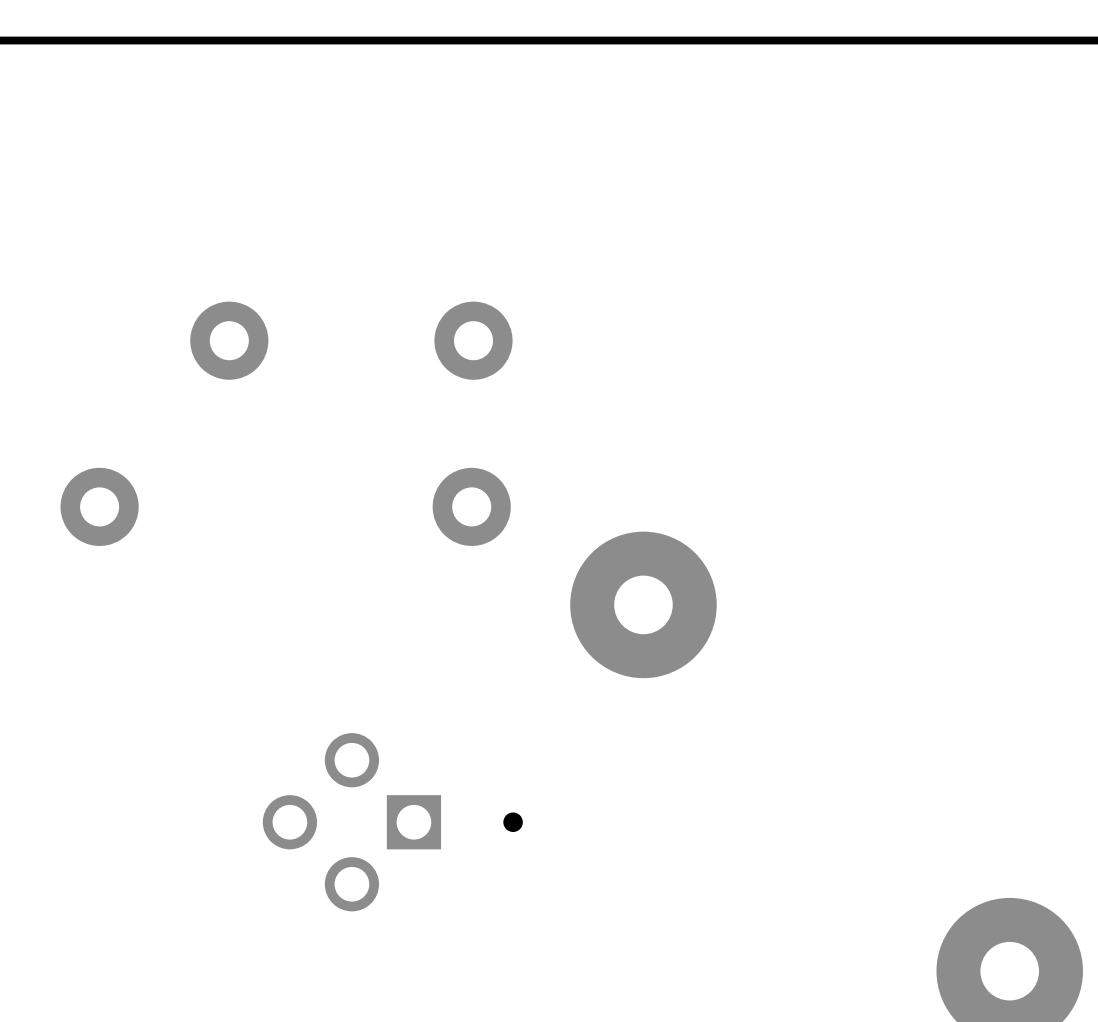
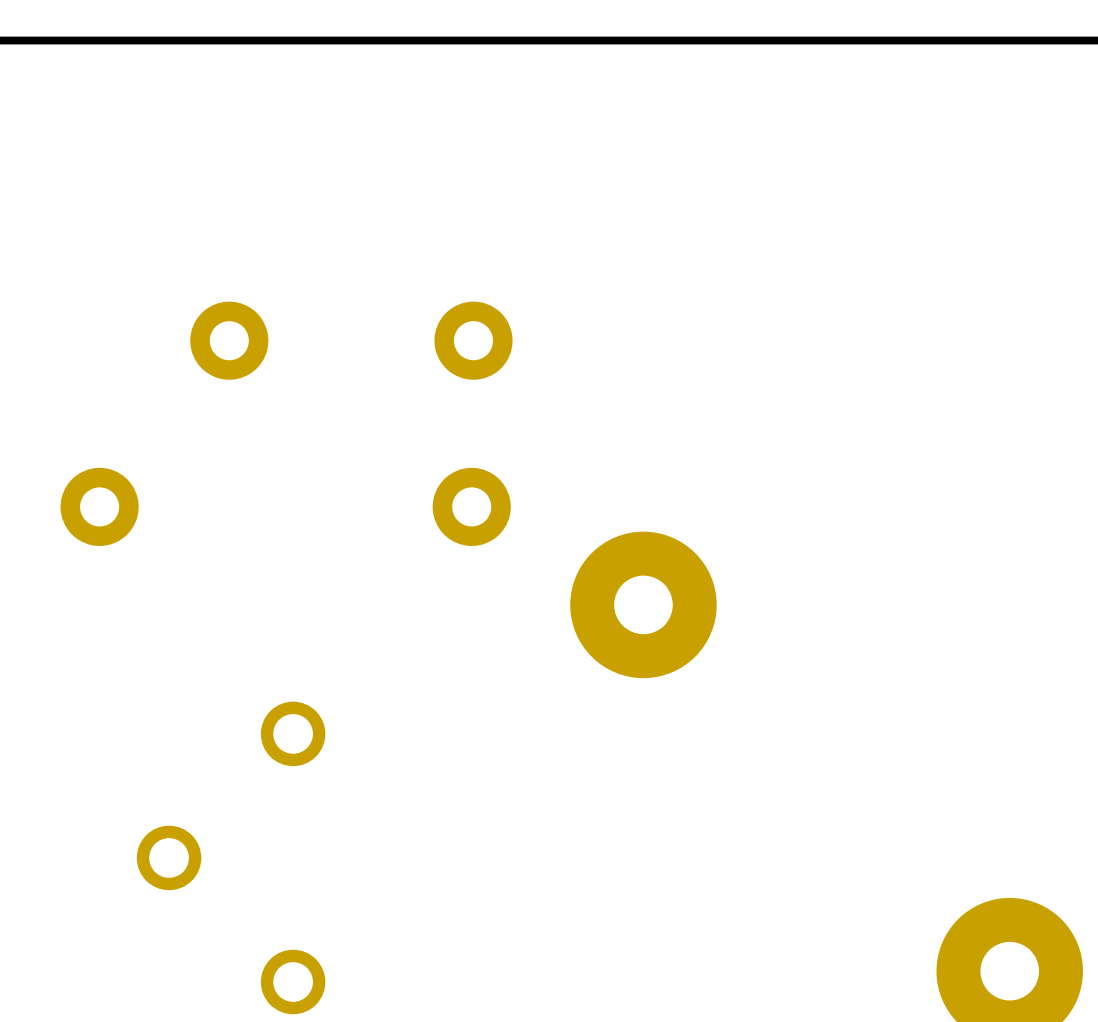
part: (392, 822) -> none
part: none -> (231, 857)

